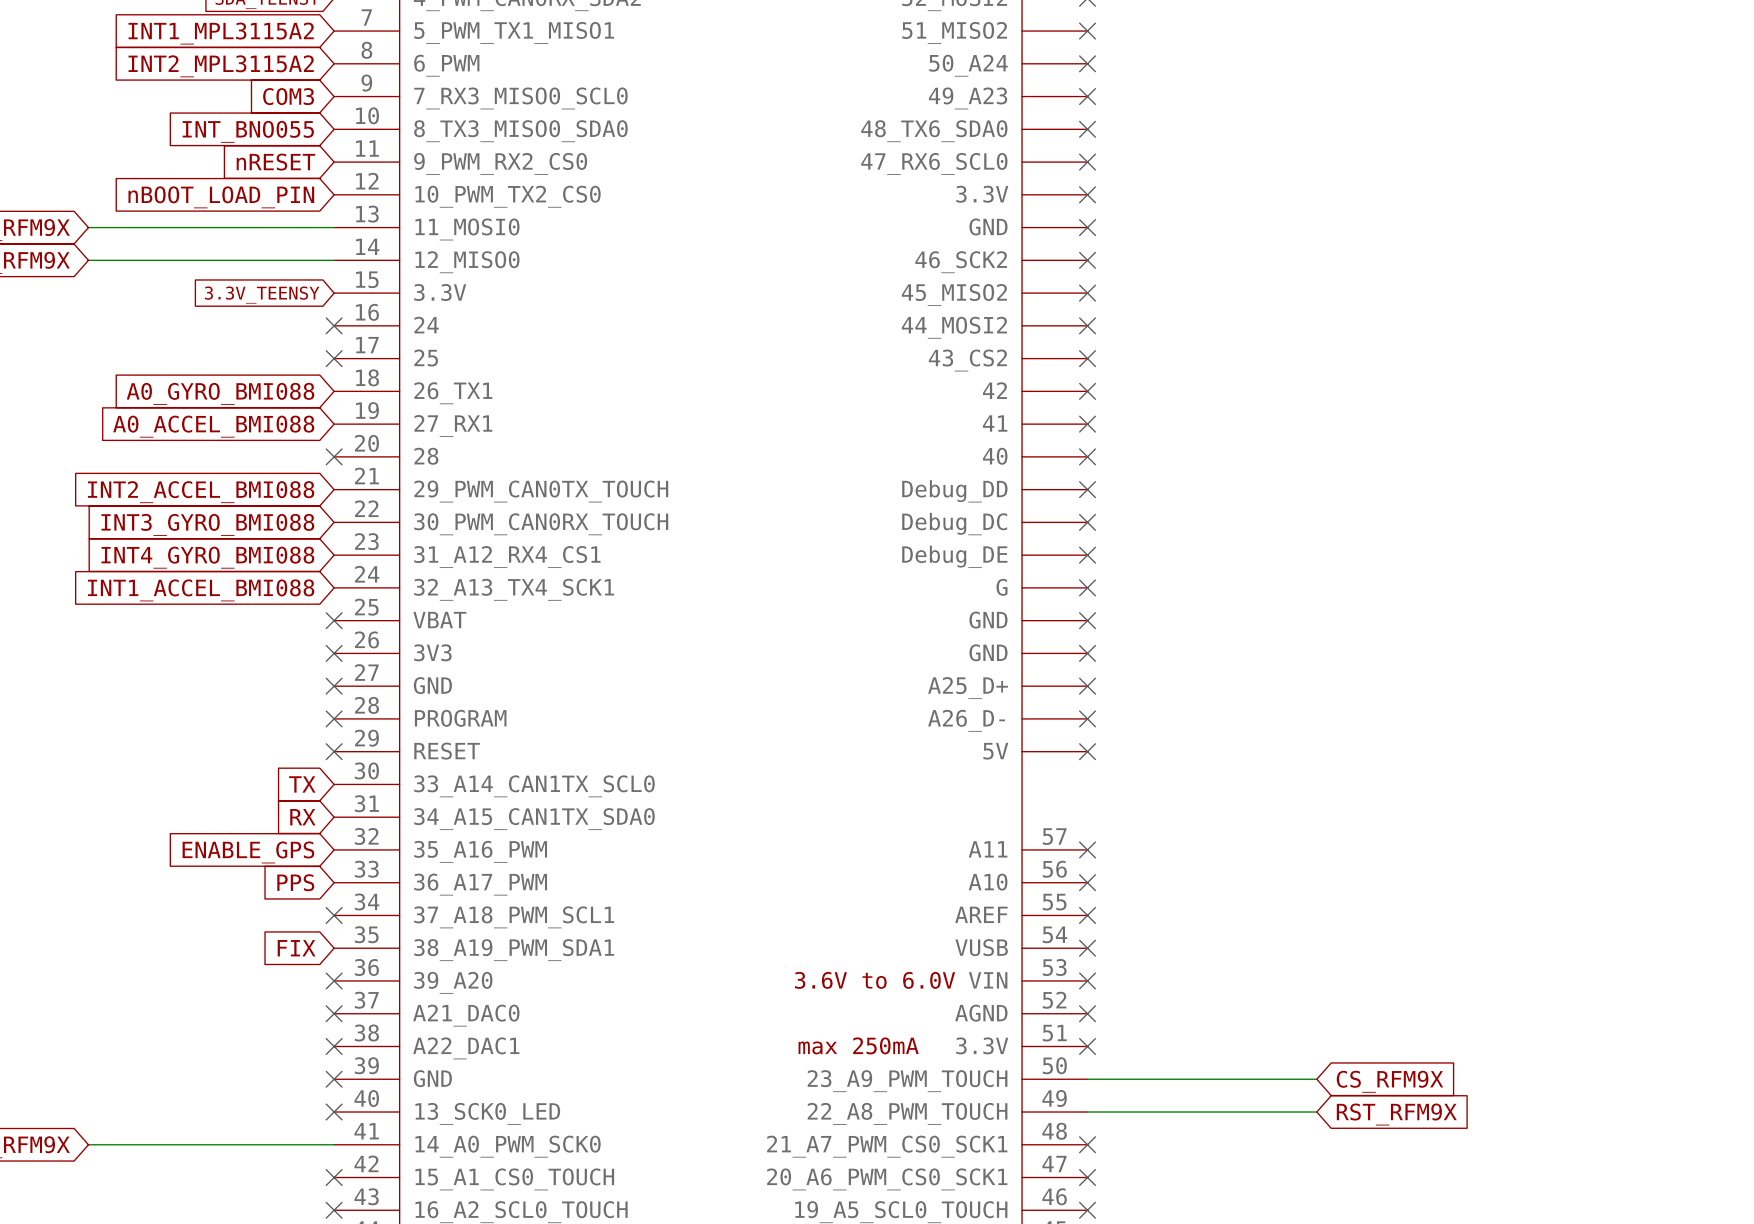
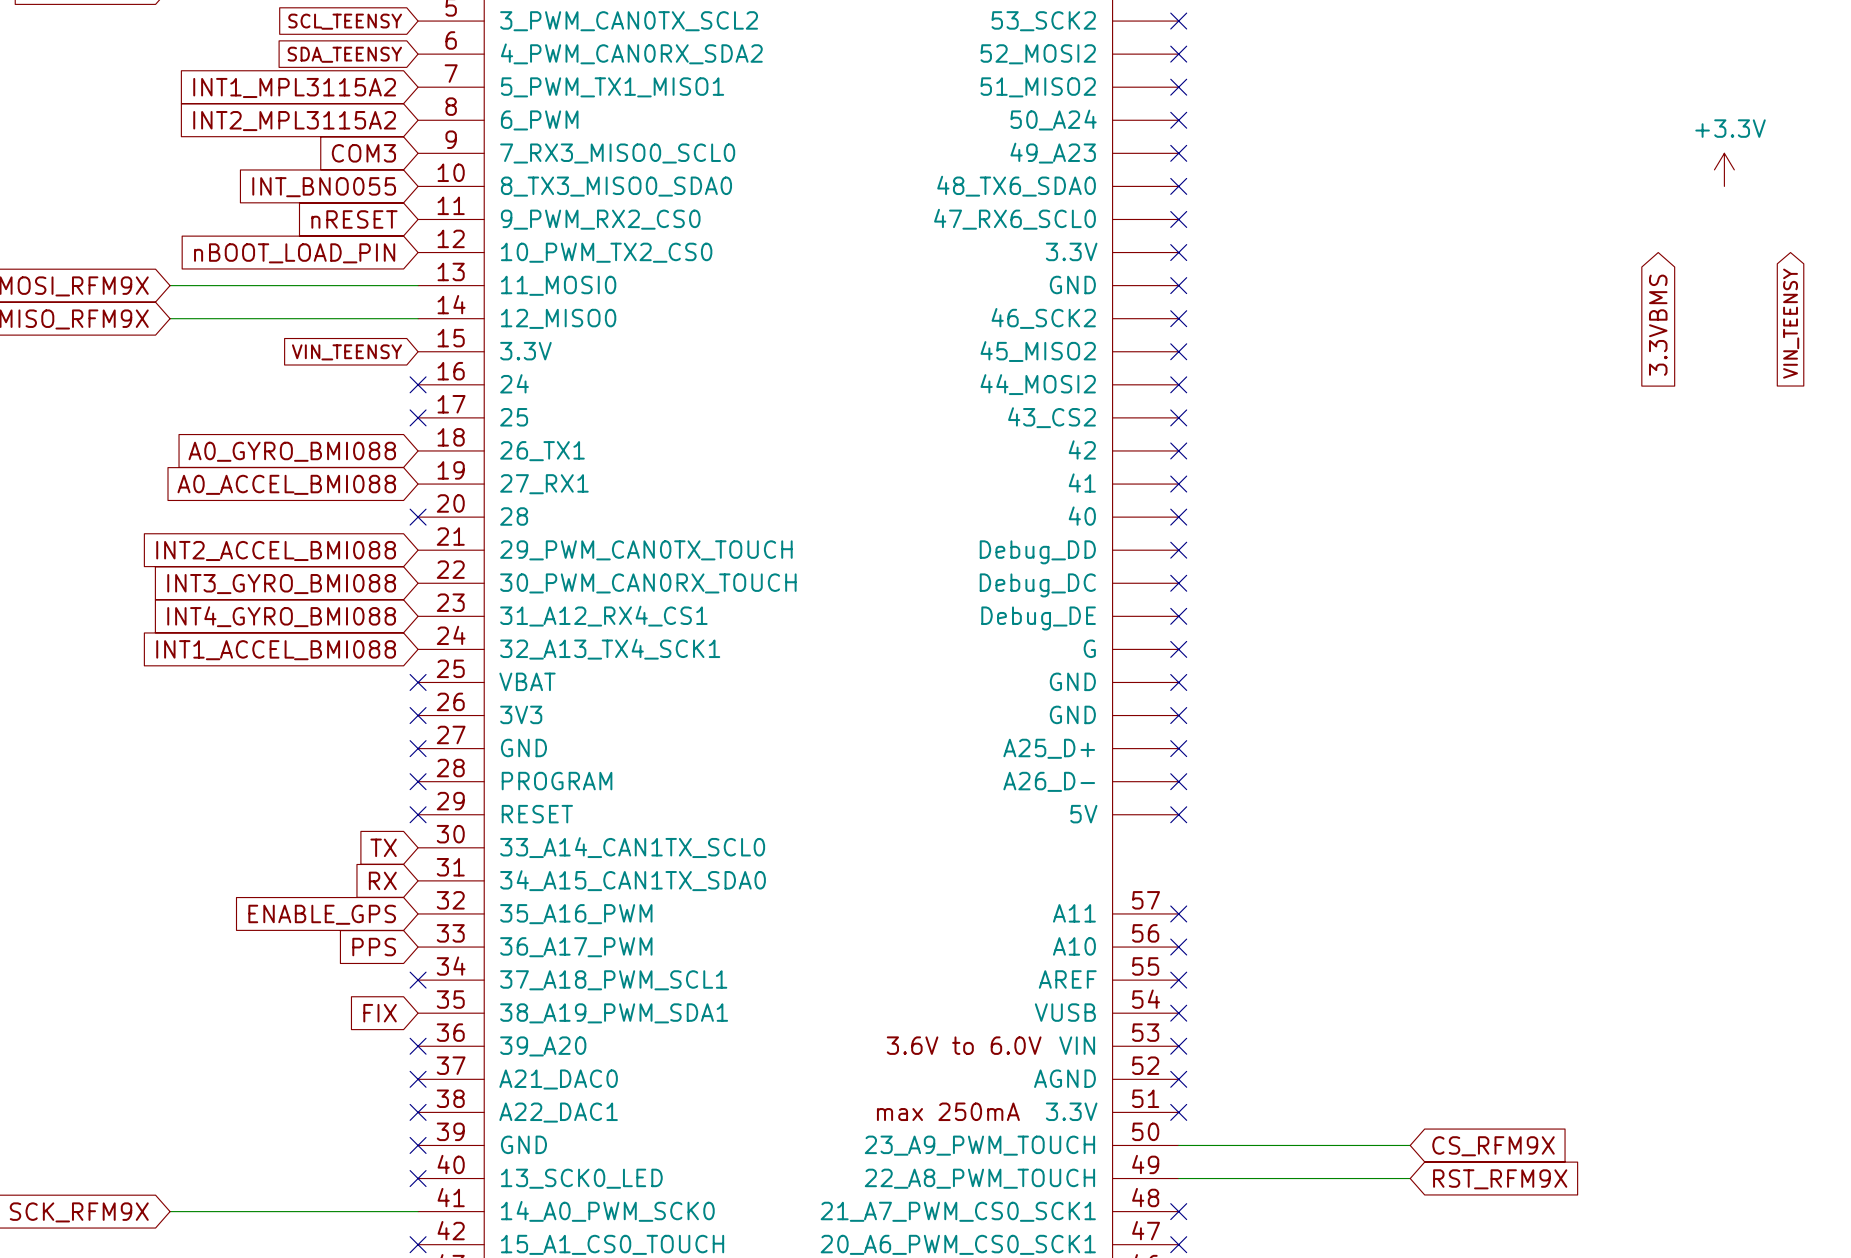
power symbol: none -> +3.3V (1724, 169)
global label: none -> 3.3VBMS (1658, 325)
global label: none -> VIN_TEENSY (1791, 323)
global label: 3.3V_TEENSY (262, 295) -> VIN_TEENSY (346, 352)

